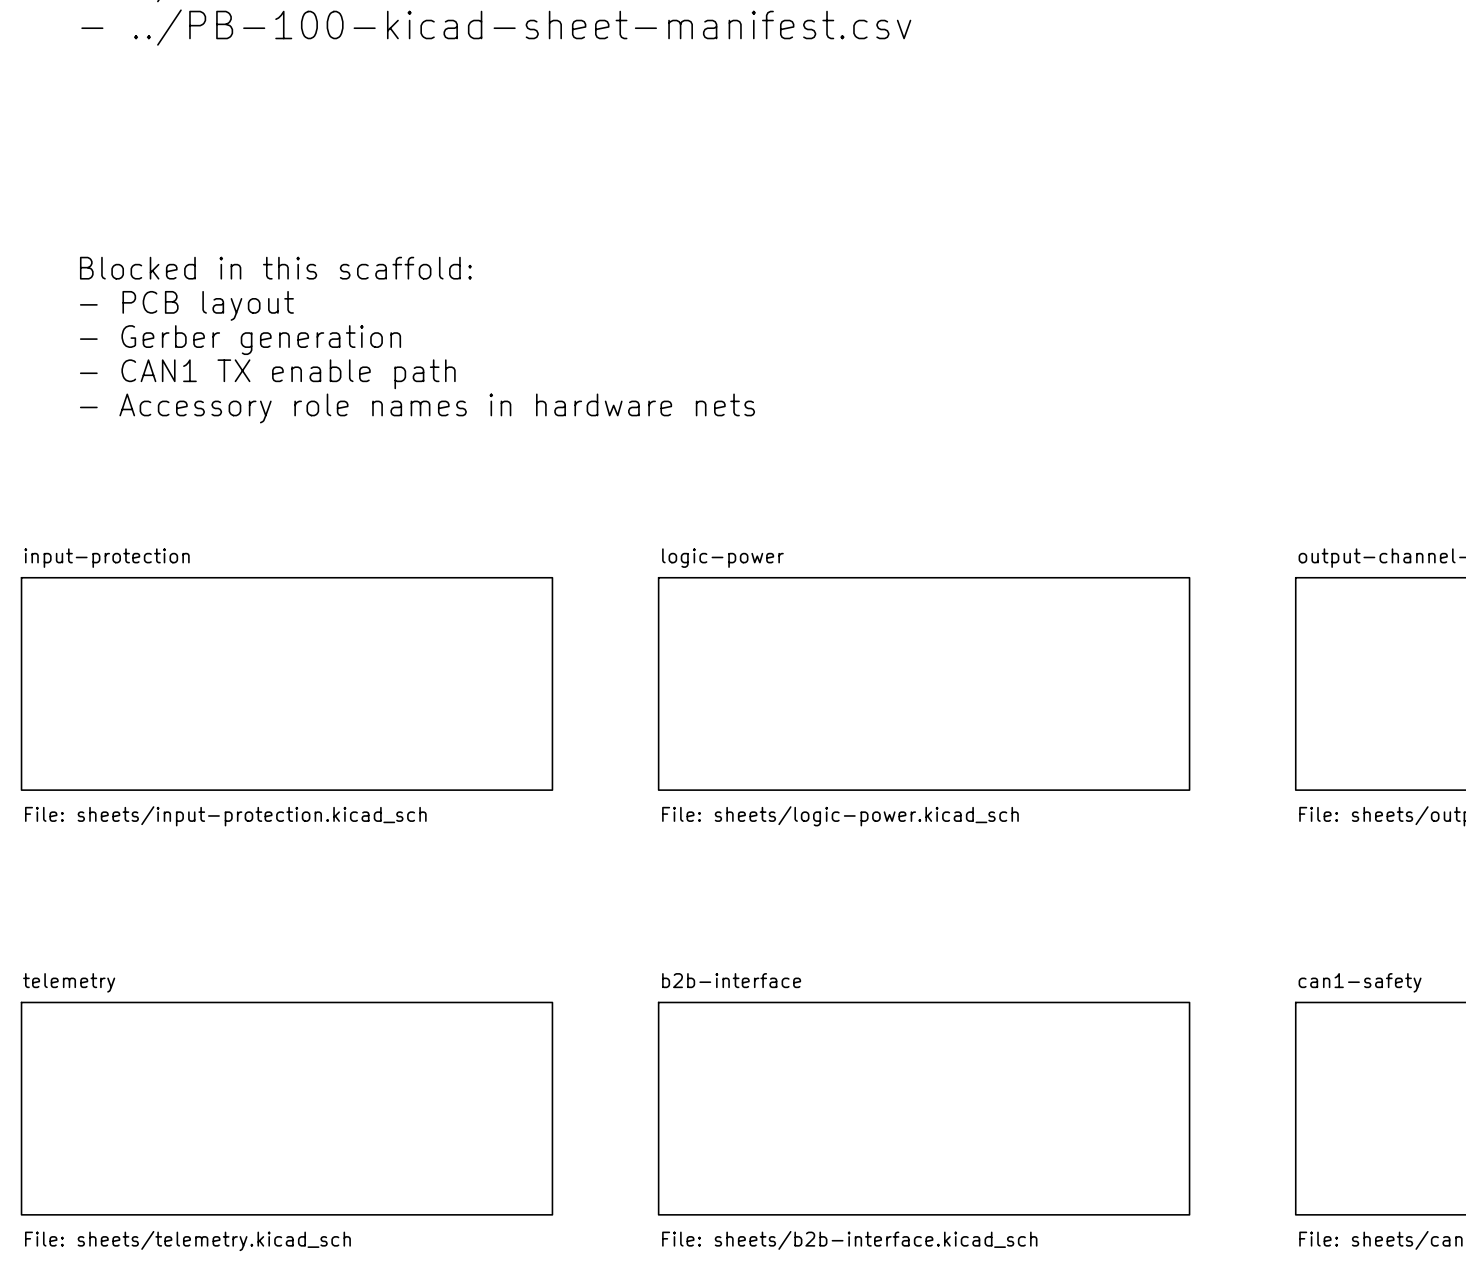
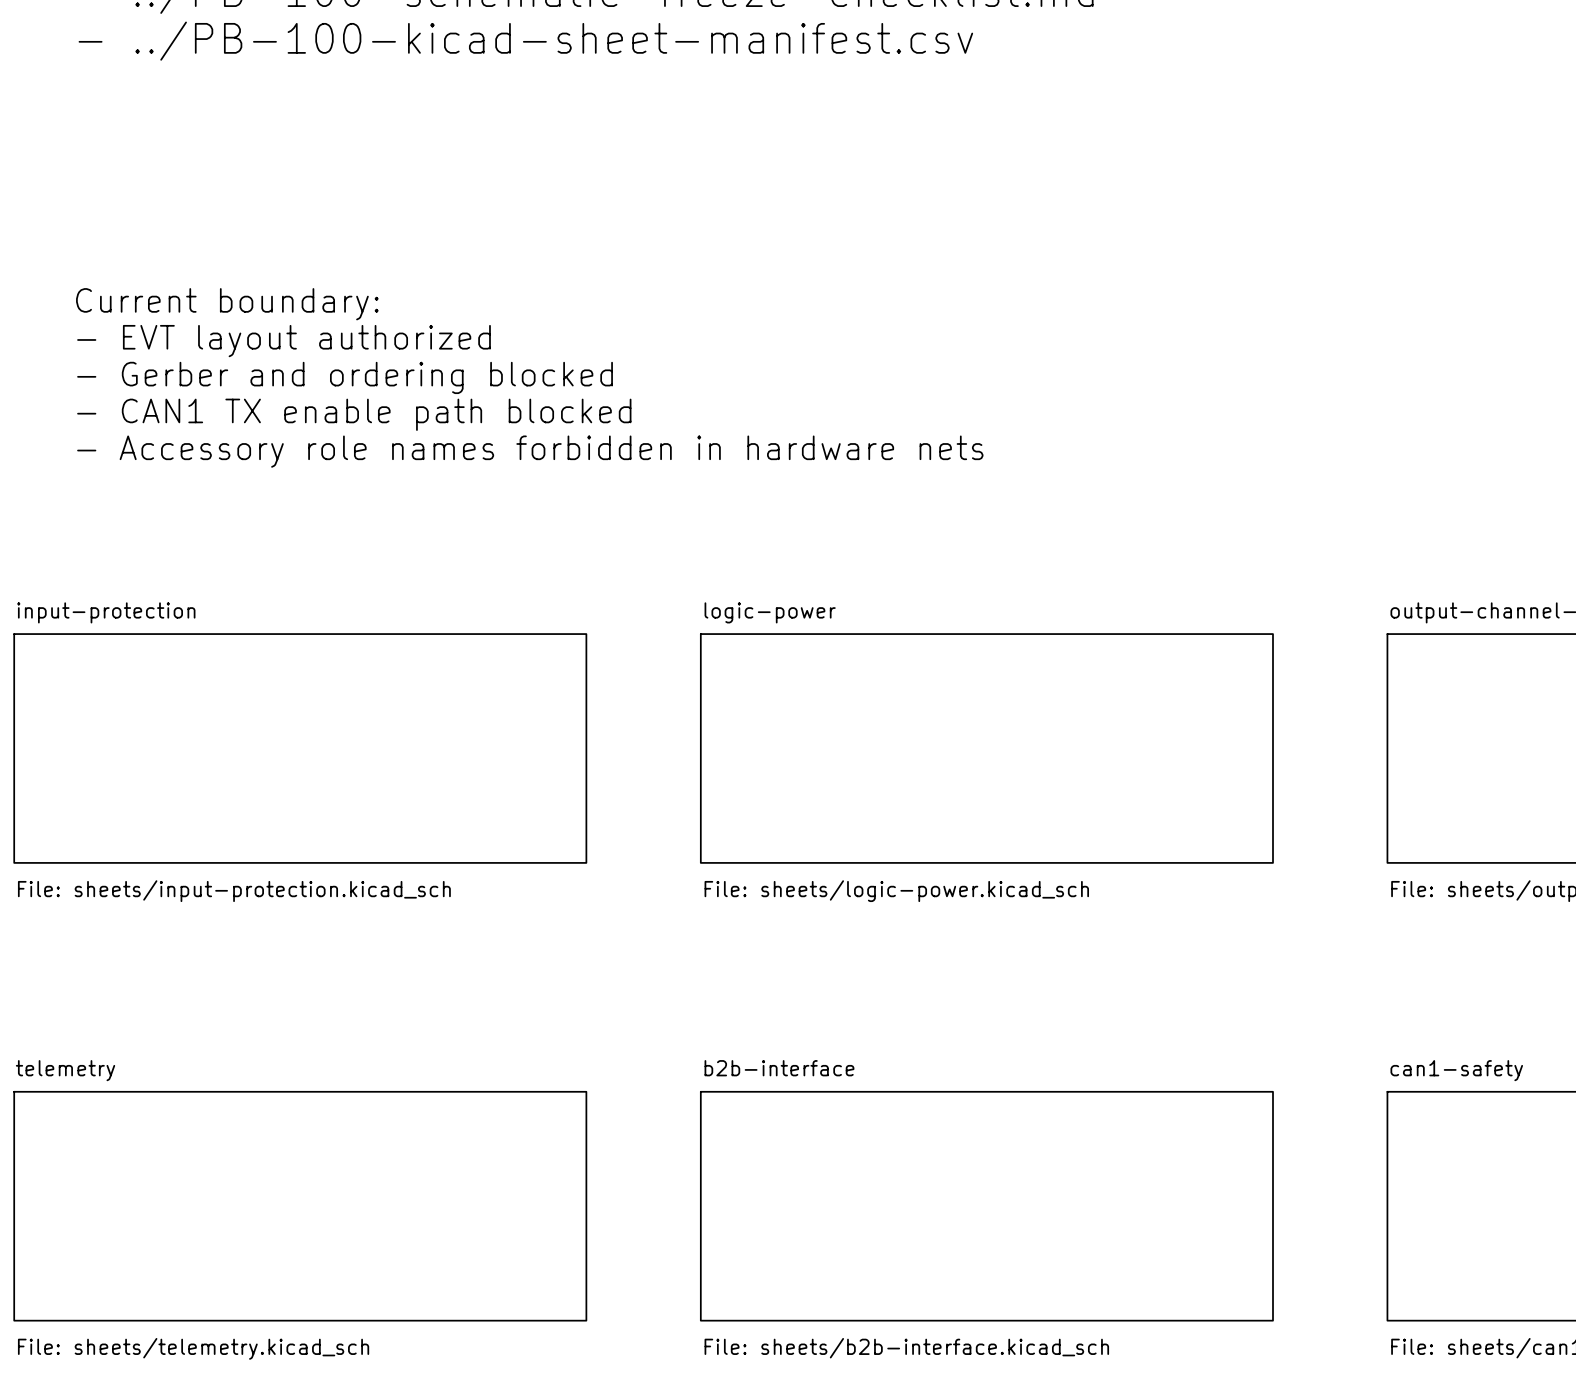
text: Blocked in this scaffold: (275, 268) -> Current boundary: (227, 304)
text: - PCB layout (186, 305) -> - EVT layout authorized (284, 341)
text: - Gerber generation (240, 340) -> - Gerber and ordering blocked (345, 377)
text: - CAN1 TX enable path (267, 374) -> - CAN1 TX enable path blocked (354, 414)
text: - Accessory role names in hardware nets (417, 408) -> - Accessory role names forbidden in hardware nets (530, 451)

